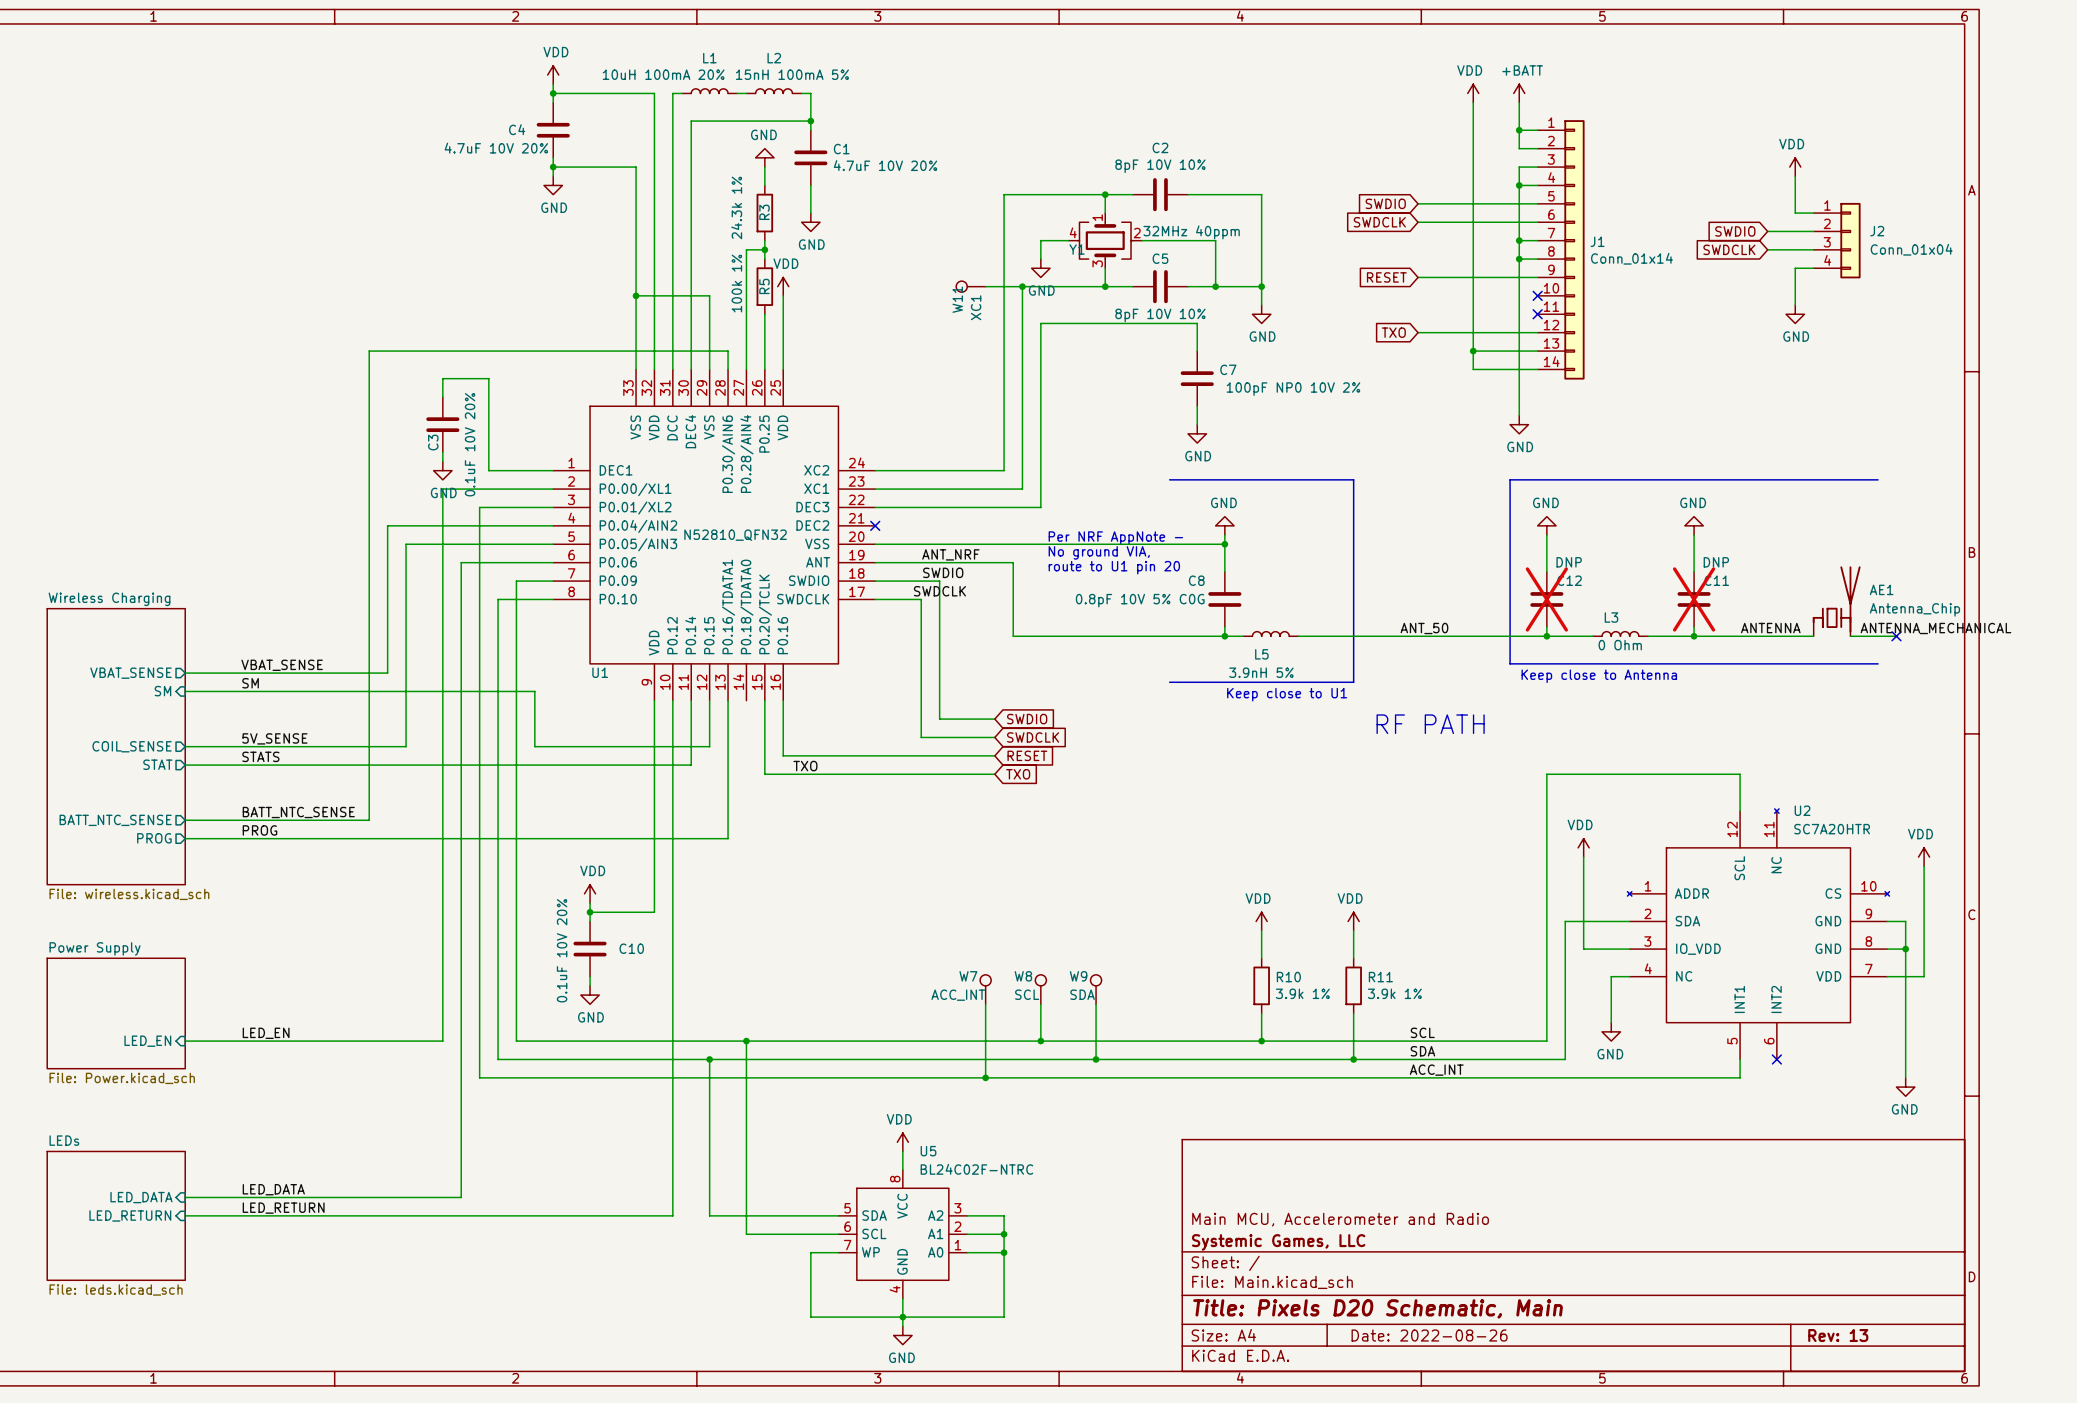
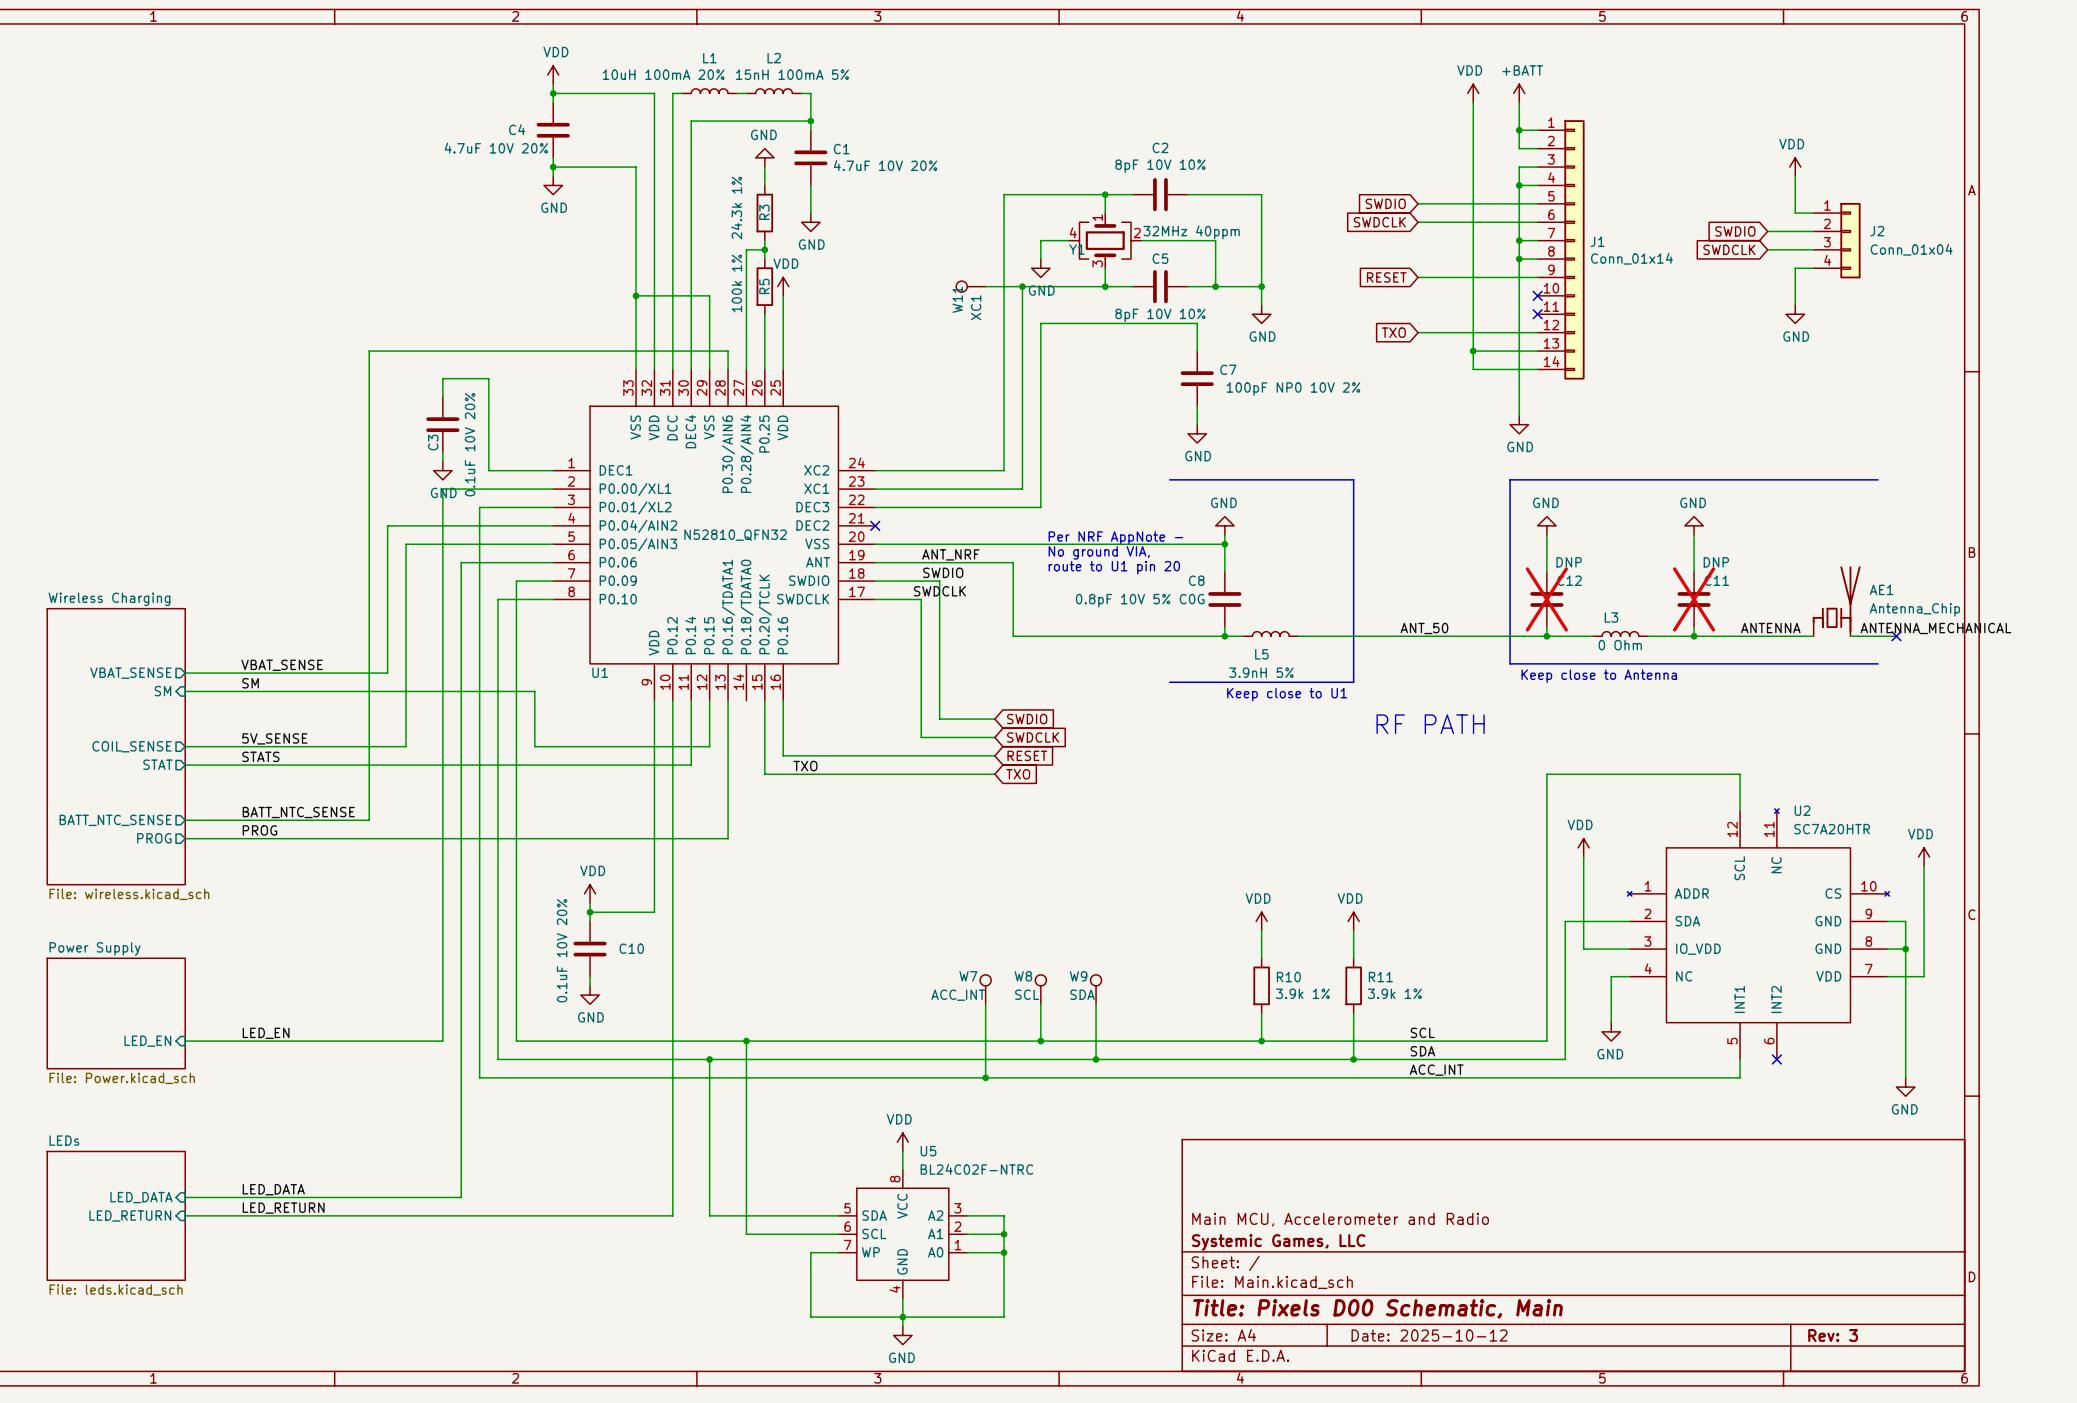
title block: Title: Pixels D20 Schematic, Main (1378, 1308) -> Title: Pixels D00 Schematic, Main (1378, 1308)
title block: Date: 2022-08-26 (1429, 1335) -> Date: 2025-10-12 (1429, 1335)
title block: Rev: 13 (1838, 1335) -> Rev: 3 (1833, 1335)

